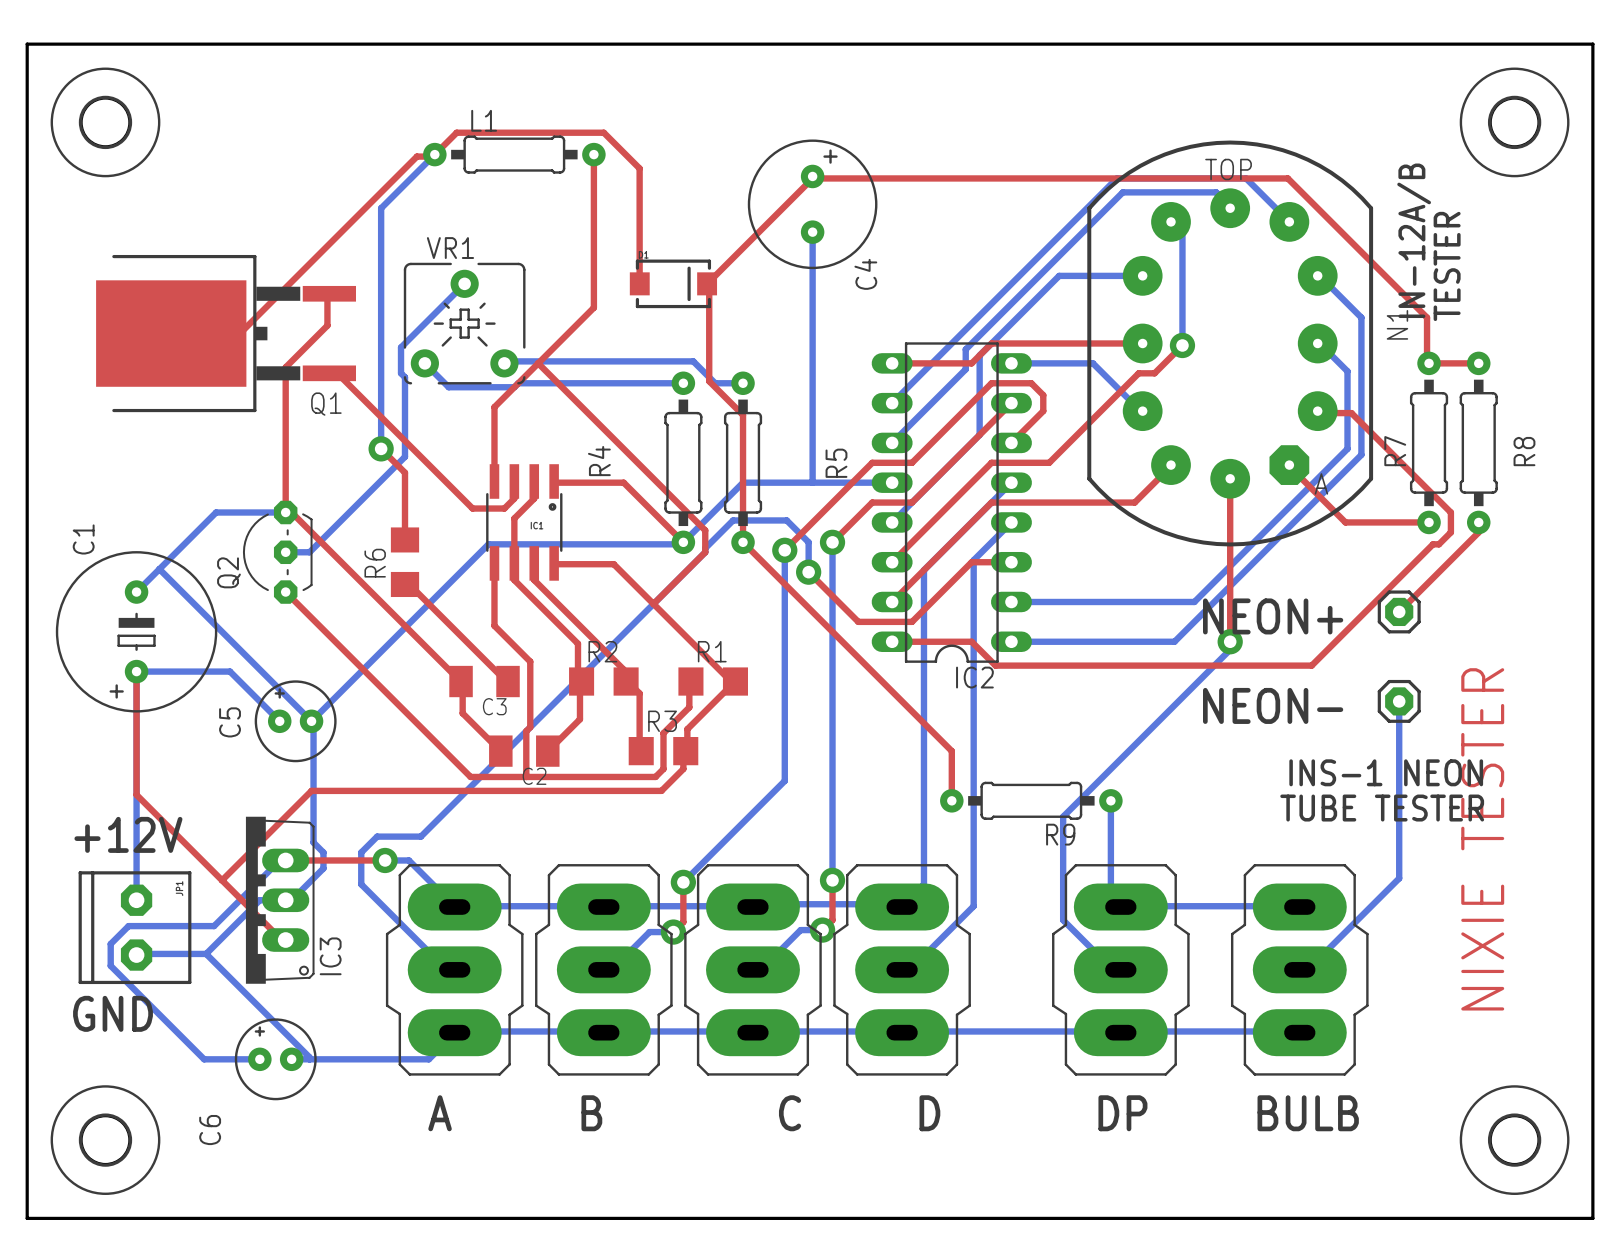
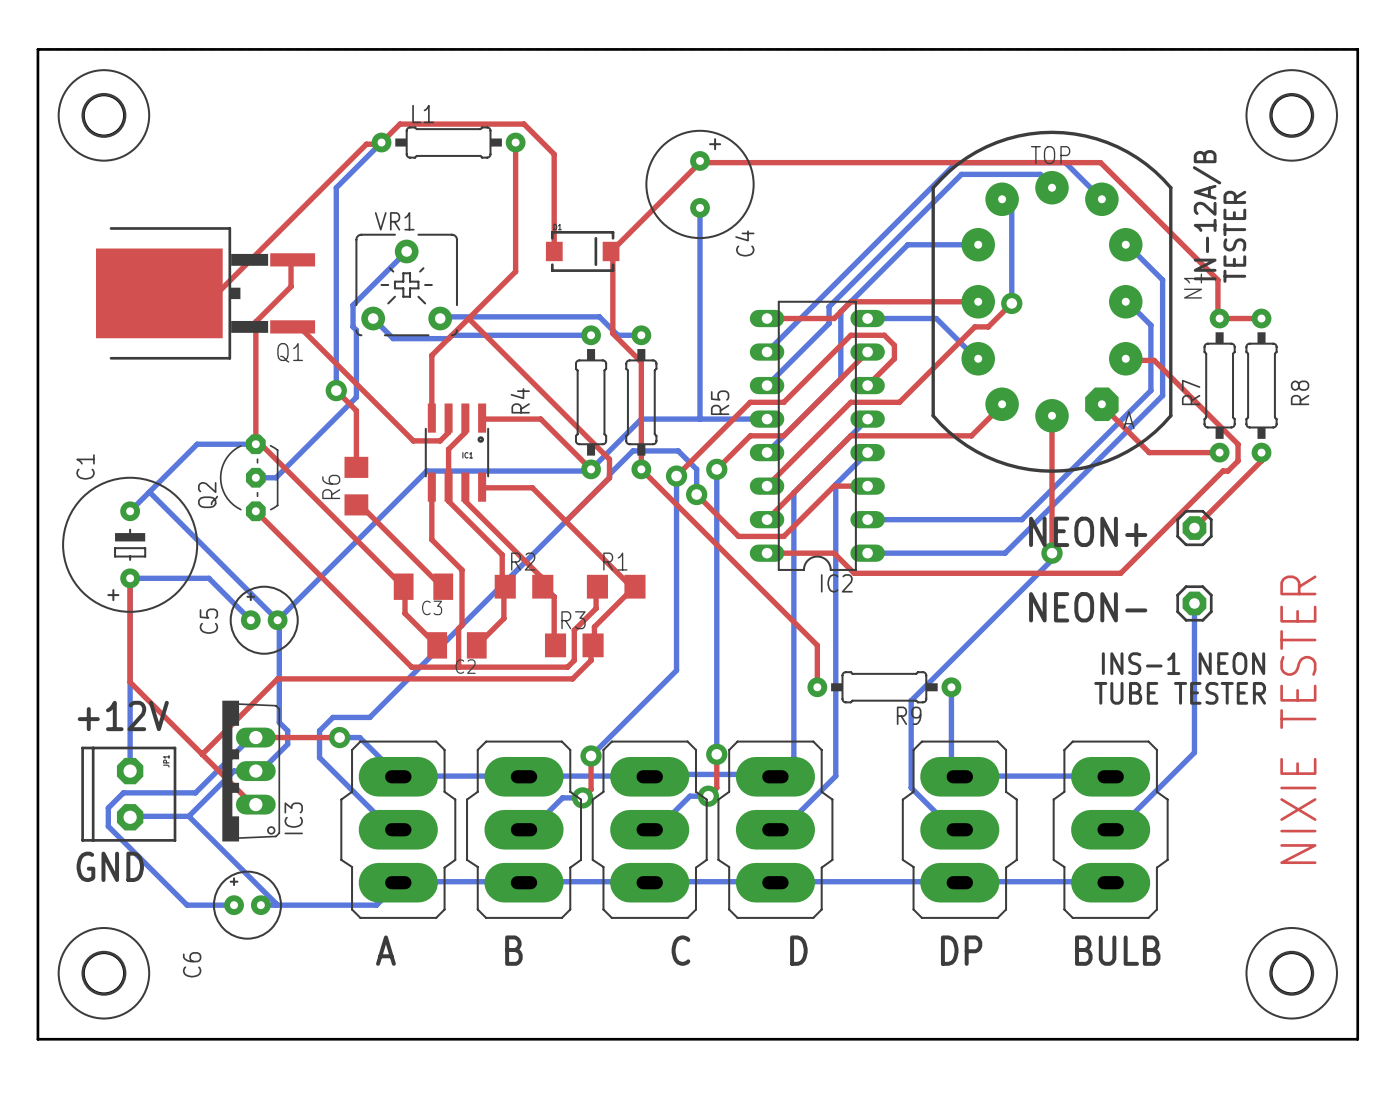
text position: NIXIE TESTER (1482, 839) -> NIXIE TESTER (1298, 719)

